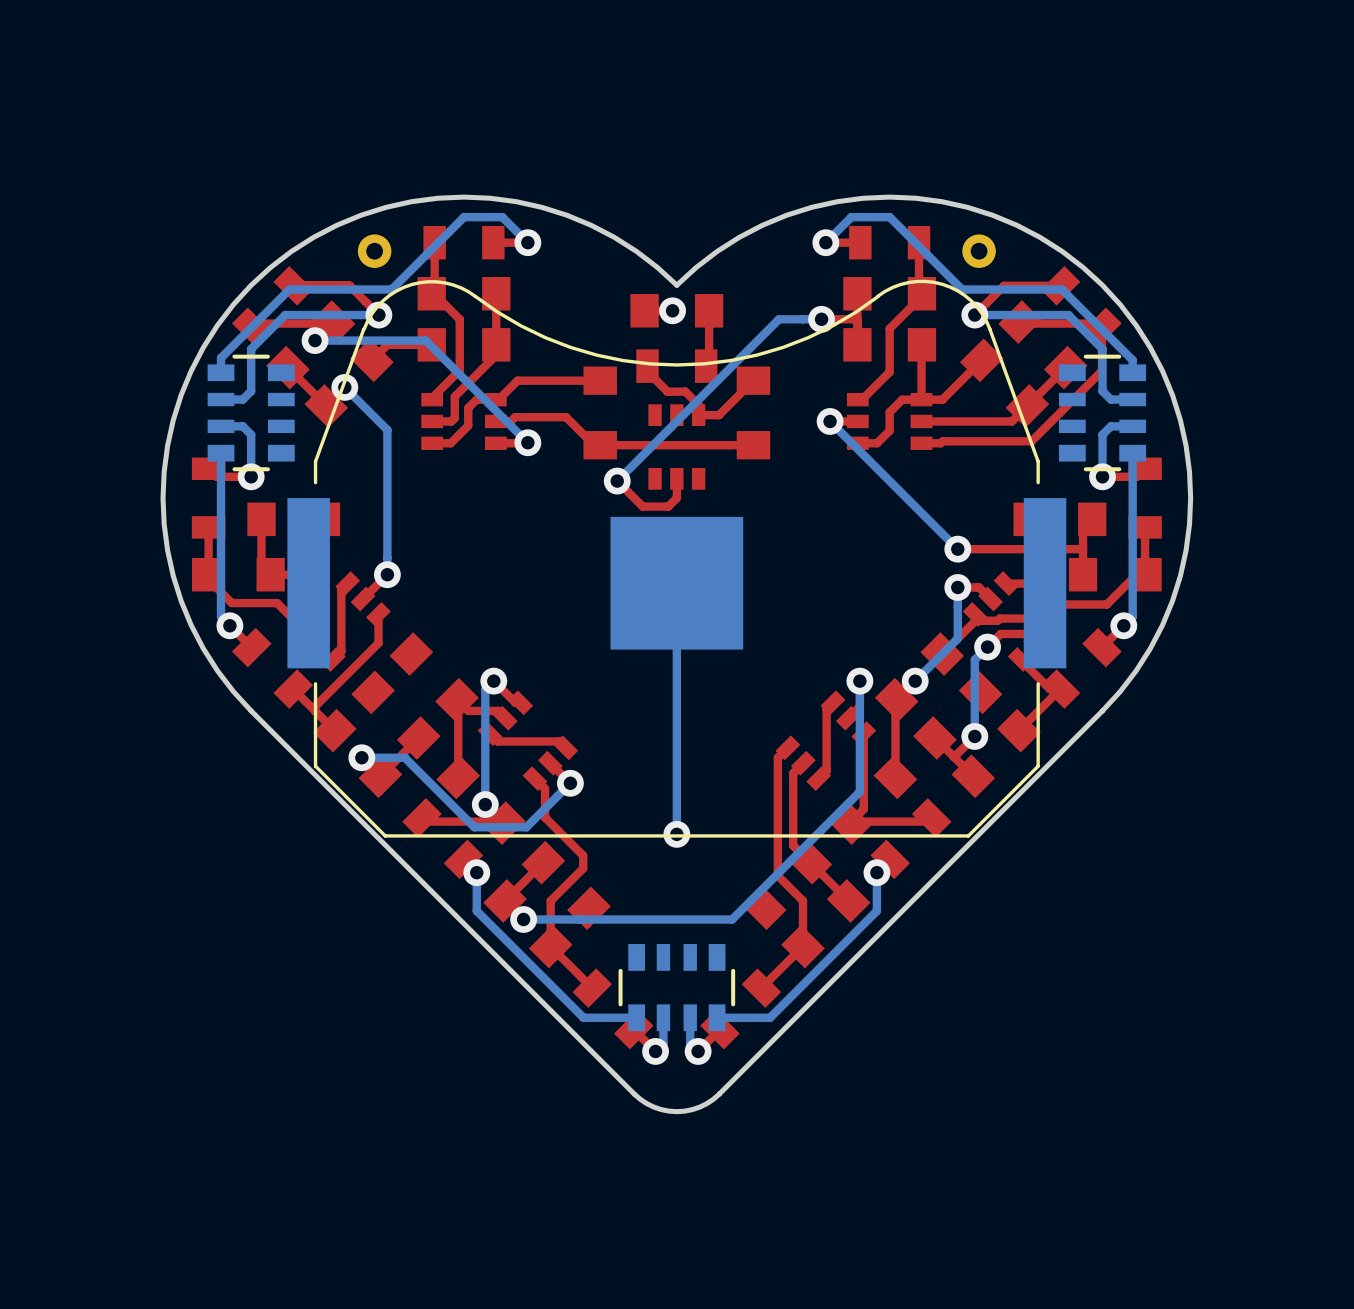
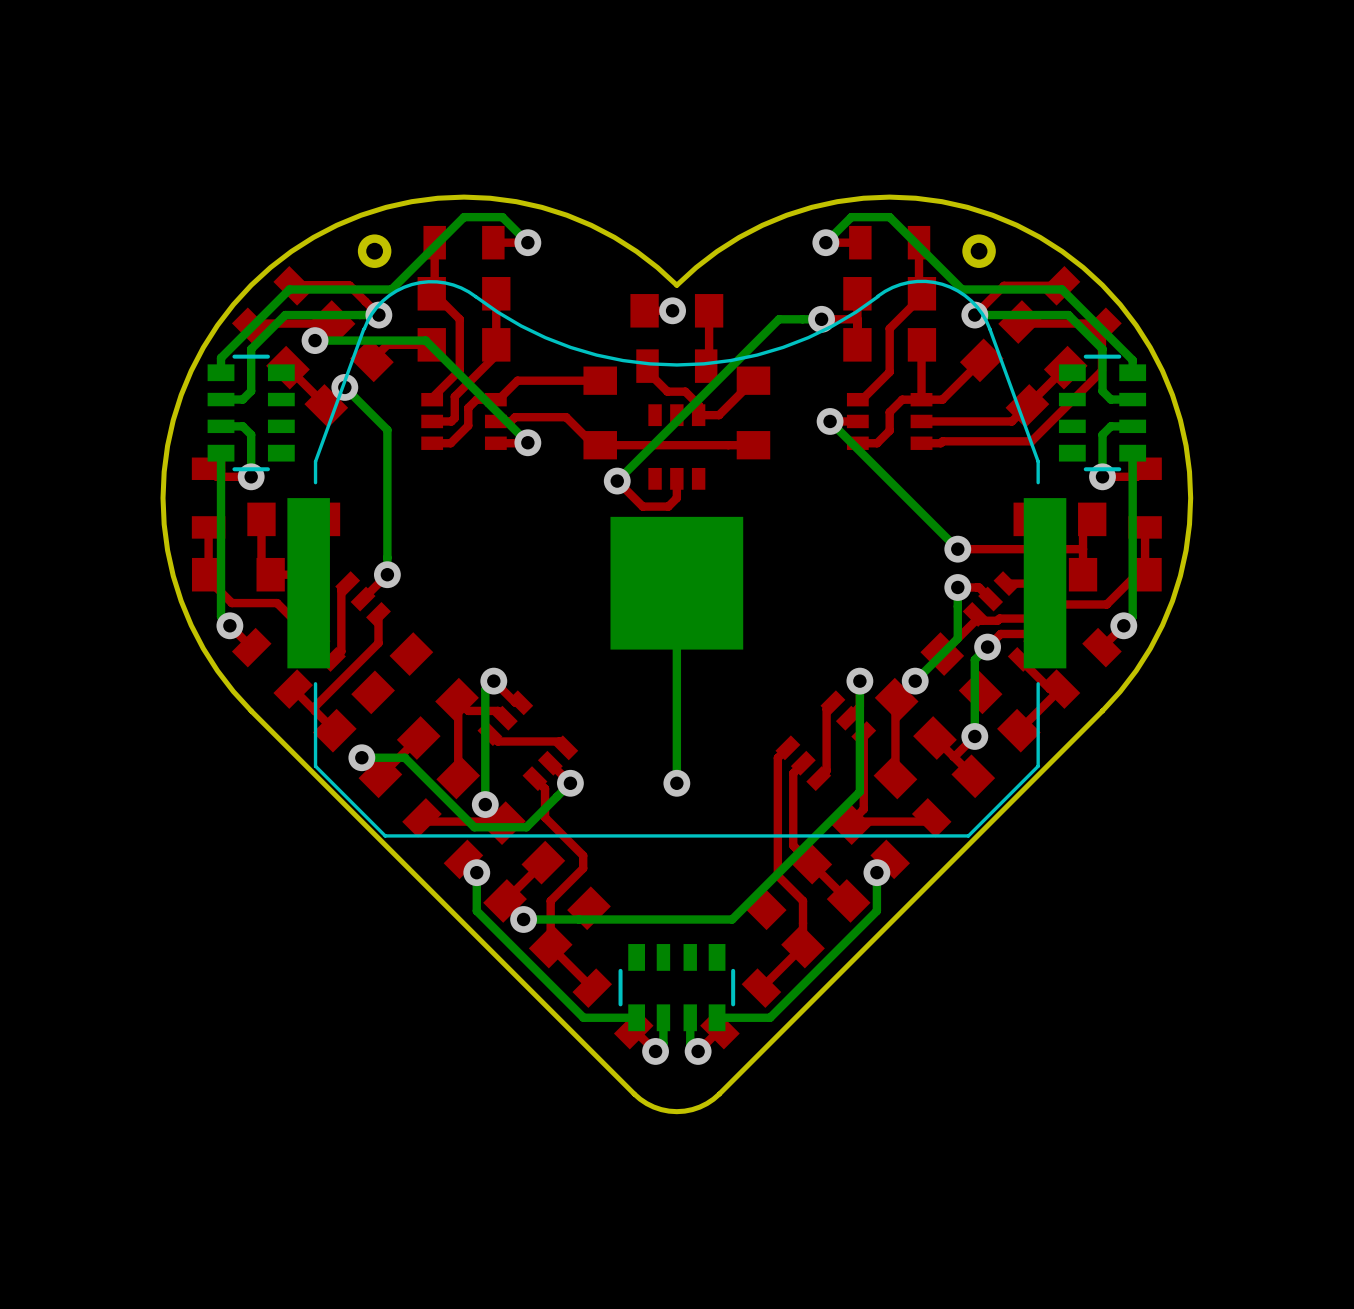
bottom track: (676, 783) (676, 834) -> none
via position: (676, 834) -> (676, 783)

